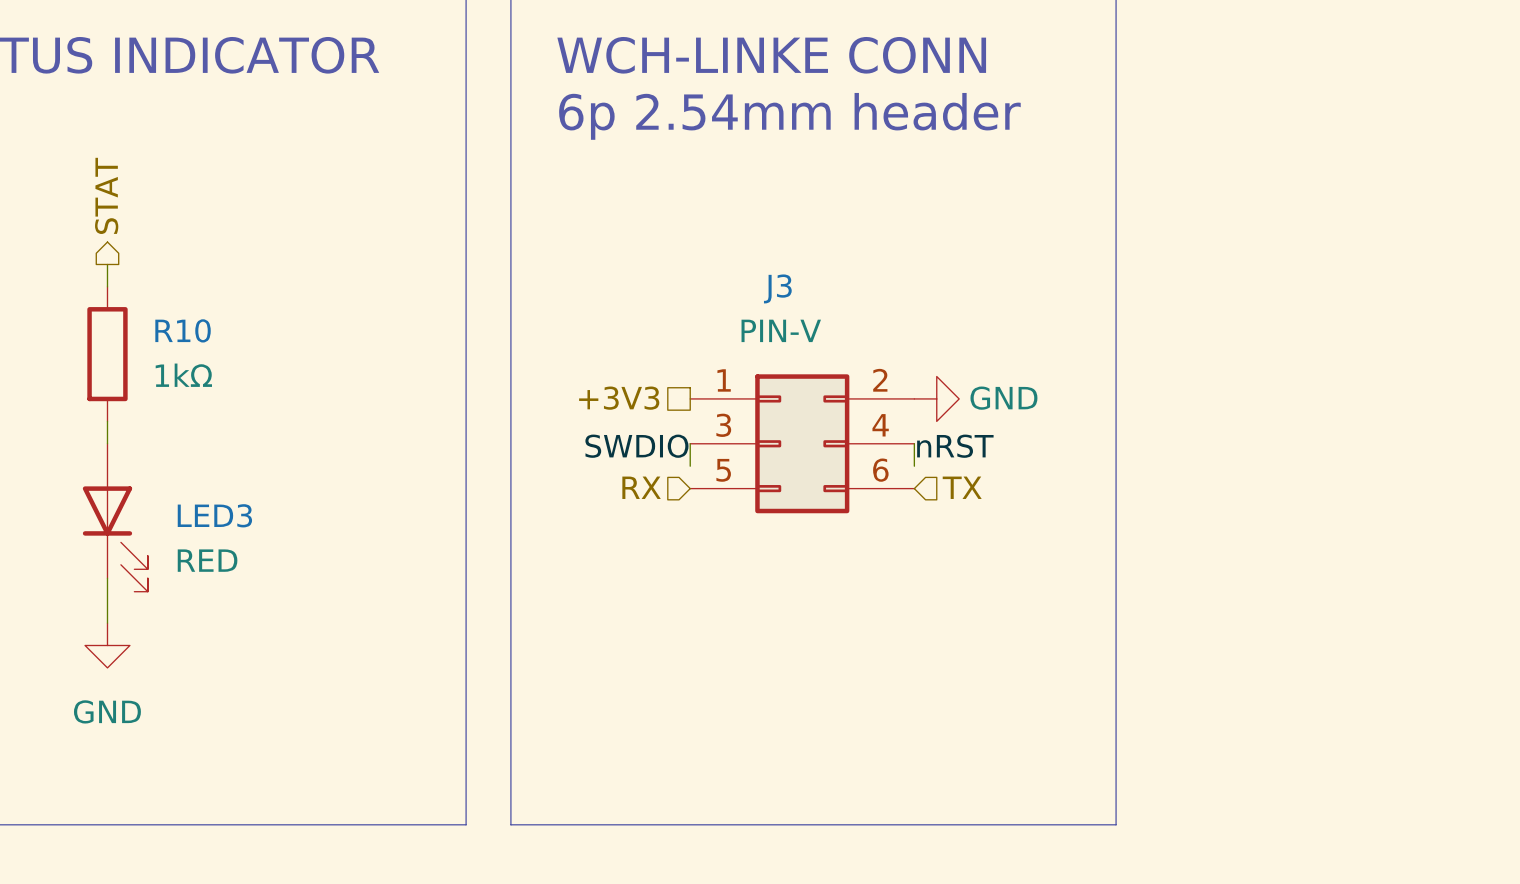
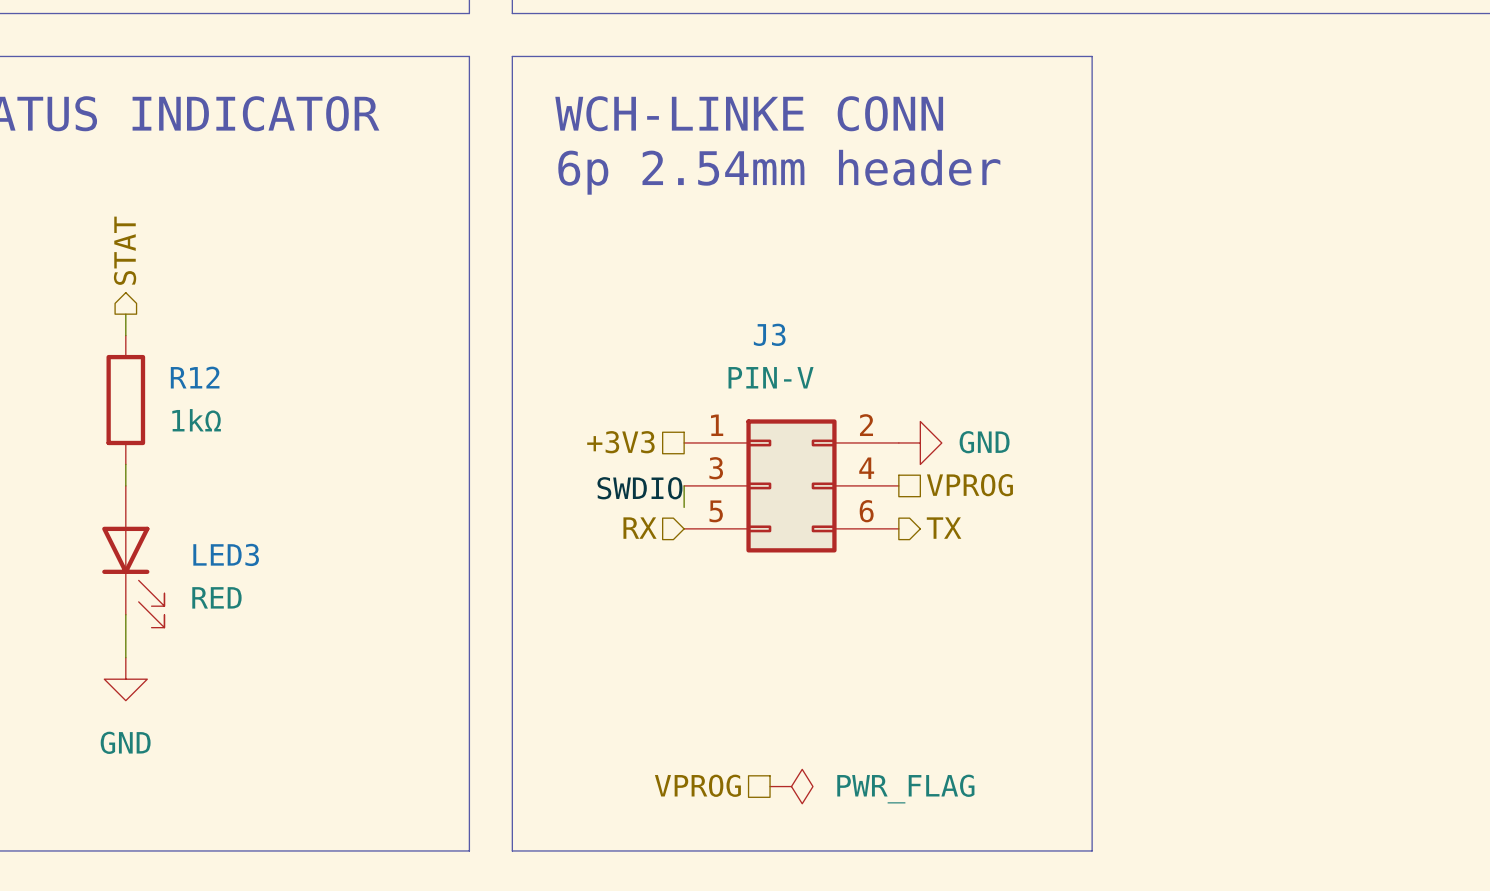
R10 name: R10 (183, 330) -> R12 (195, 377)
hierarchical label: none -> VPROG (969, 485)
wire: (914, 443) (914, 466) -> none
label: nRST (955, 446) -> none
hierarchical label shape: input (962, 487) -> output (944, 528)
hierarchical label: none -> VPROG (697, 785)
power symbol: none -> PWR_FLAG (791, 786)

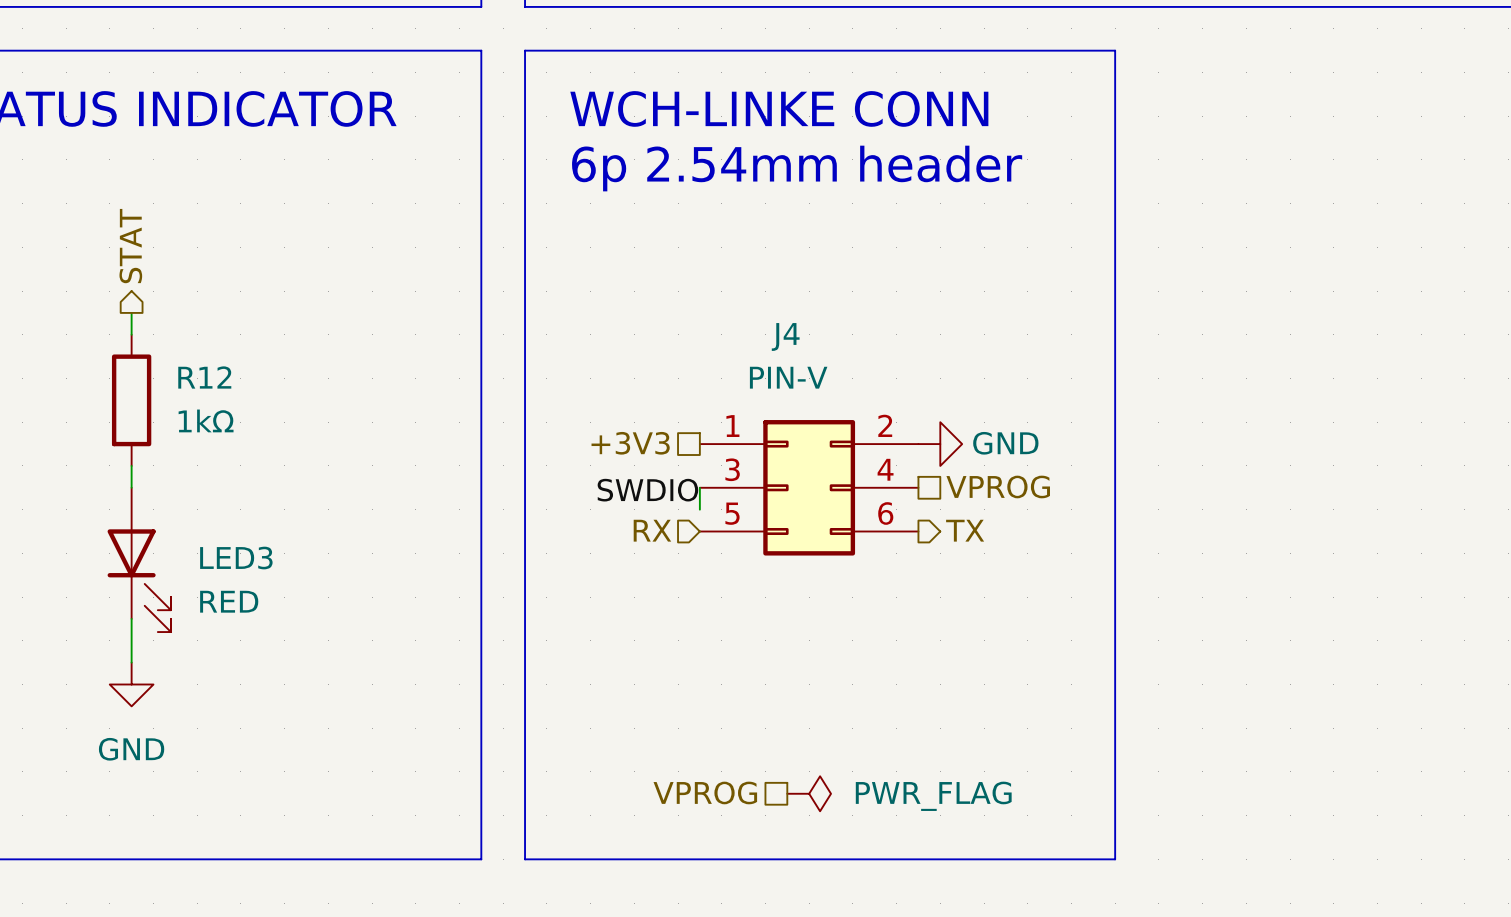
J3 name: J3 (769, 334) -> J4 (785, 336)

